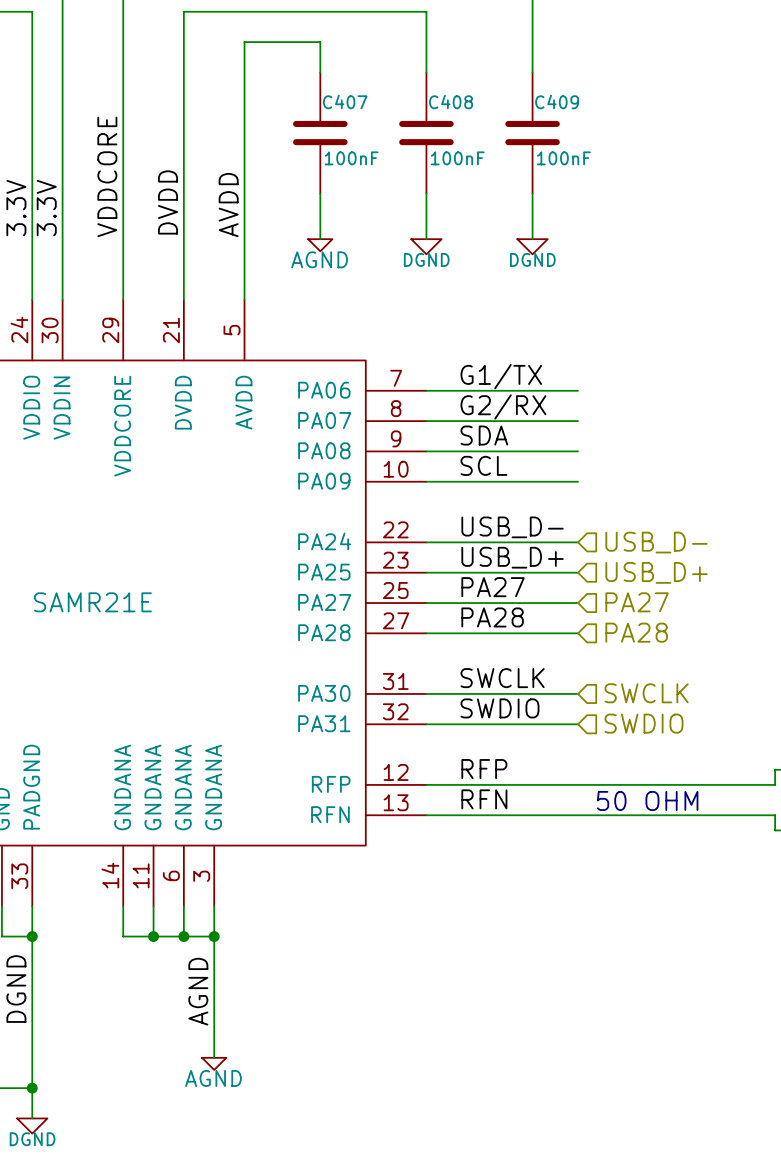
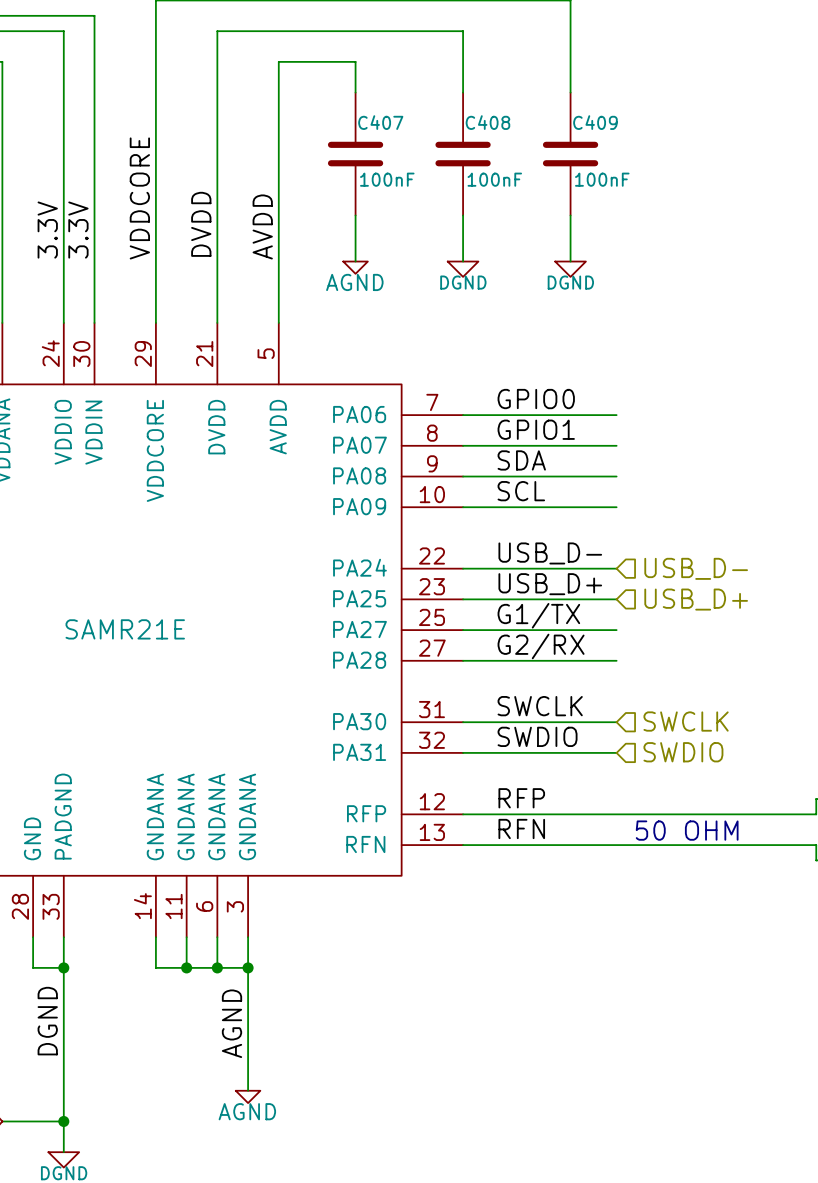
label: G1/TX (501, 376) -> GPIO0 (536, 399)
label: G2/RX (503, 406) -> GPIO1 (536, 429)
label: PA27 (493, 587) -> G1/TX (538, 615)
hierarchical label: PA27 (637, 602) -> none
label: PA28 (492, 617) -> G2/RX (541, 646)
hierarchical label: PA28 (636, 632) -> none

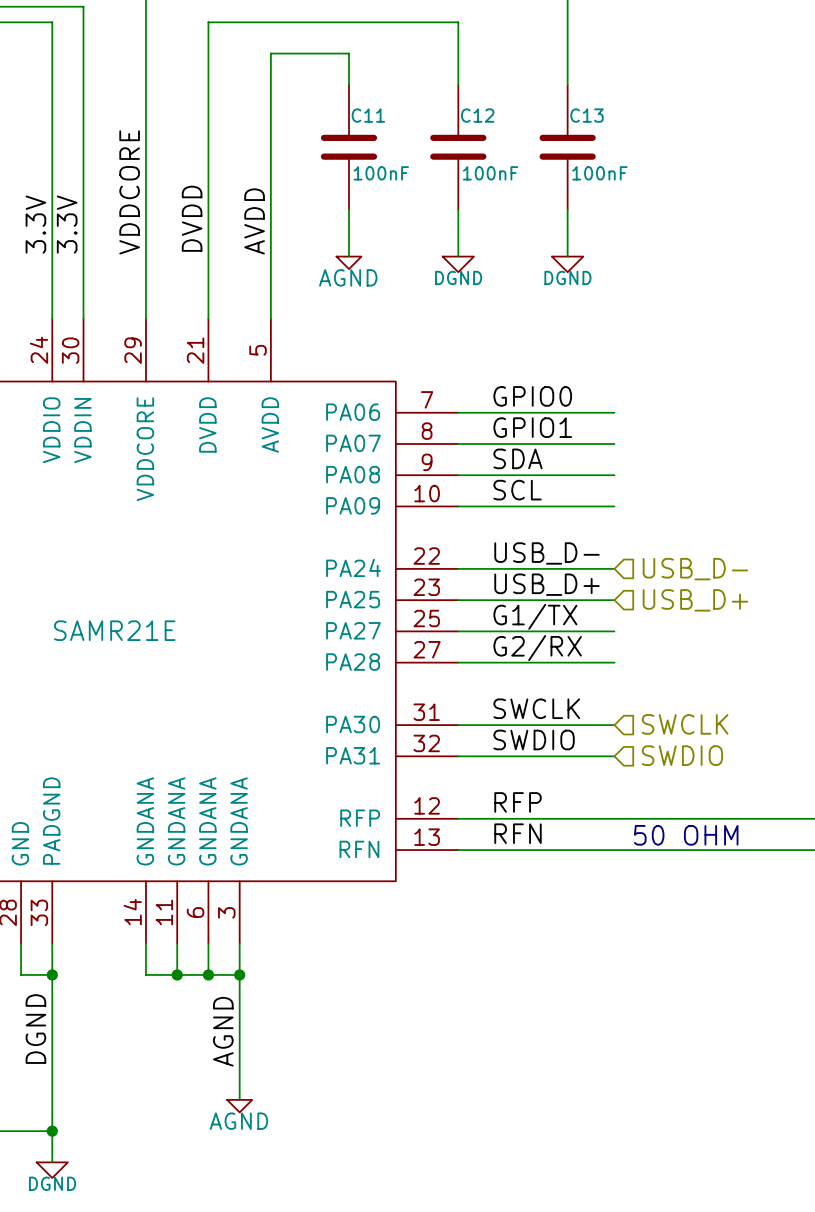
C407 name: C407 (380, 122) -> C11 (368, 115)
C408 name: C408 (487, 122) -> C12 (477, 115)
C409 name: C409 (595, 122) -> C13 (587, 115)

